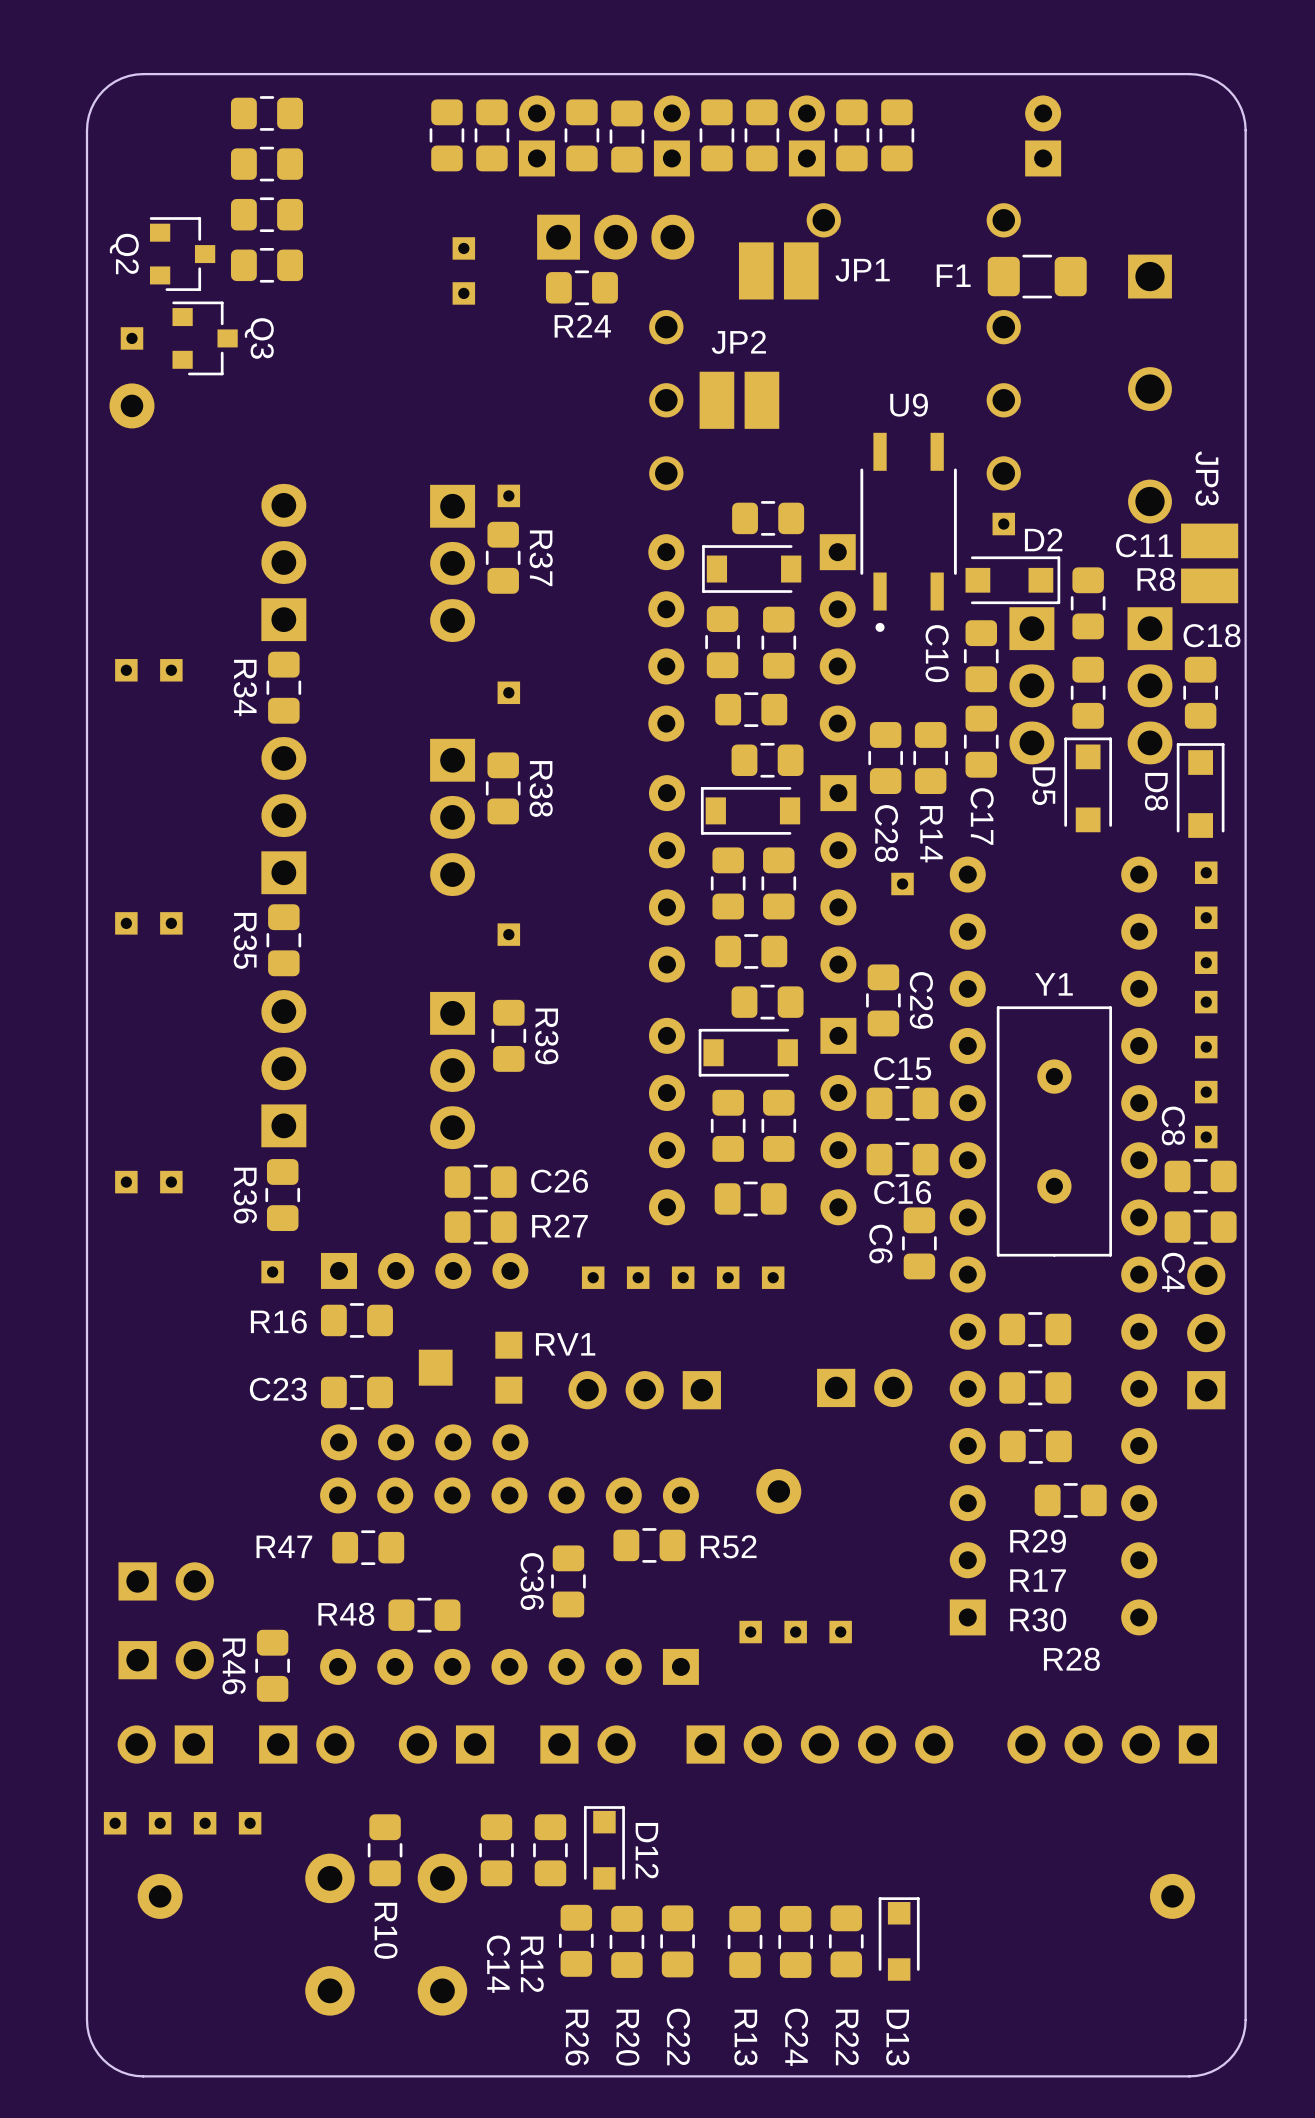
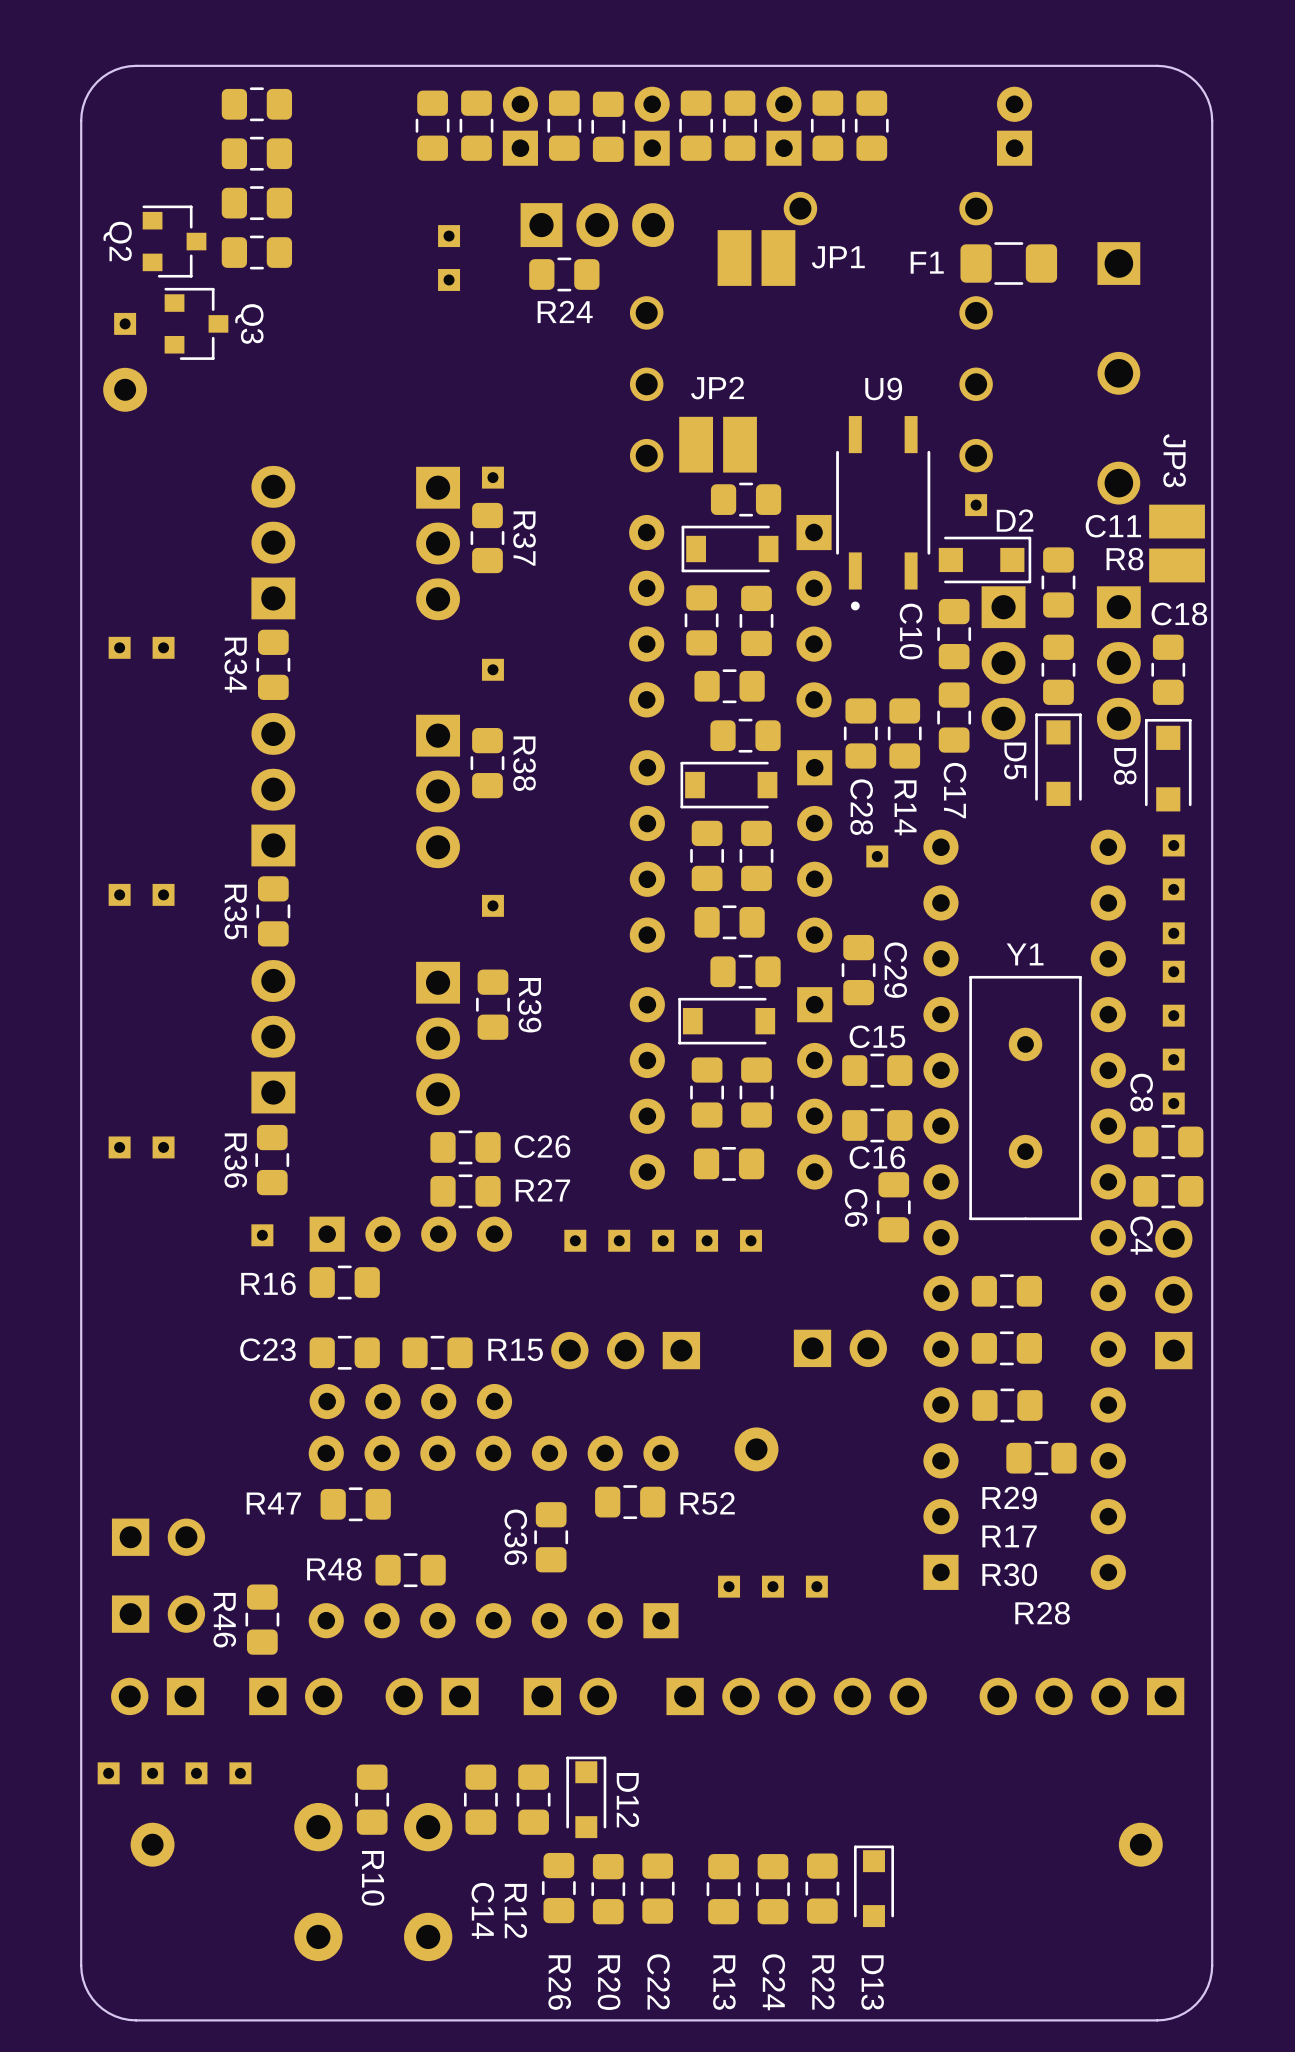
JP2 position: (739, 400) -> (718, 444)
RV1: (470, 1367) -> none
R15: none -> (437, 1352)

